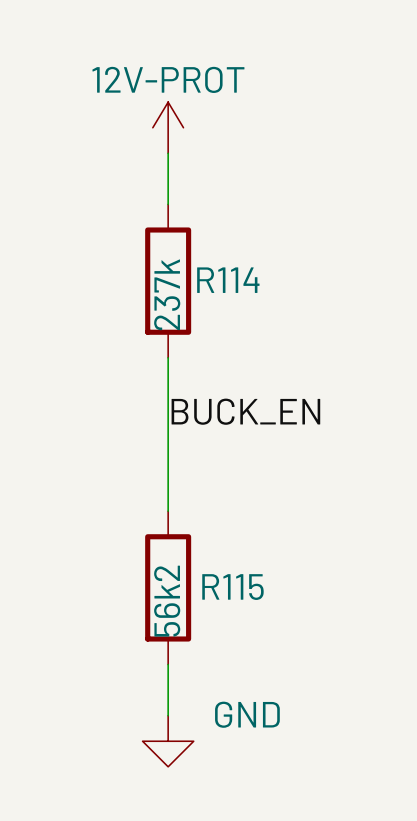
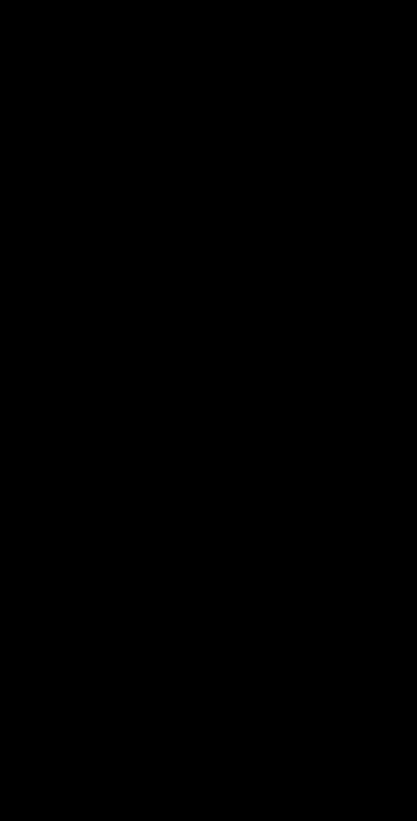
power symbol: 12V-PROT (168, 127) -> none
wire: (168, 153) (168, 204) -> none
R114: 237k (168, 281) -> none
wire: (168, 357) (168, 511) -> none
label: BUCK_EN (245, 411) -> none
R115: 56k2 (168, 587) -> none
wire: (168, 664) (168, 715) -> none
power symbol: GND (168, 741) -> none

